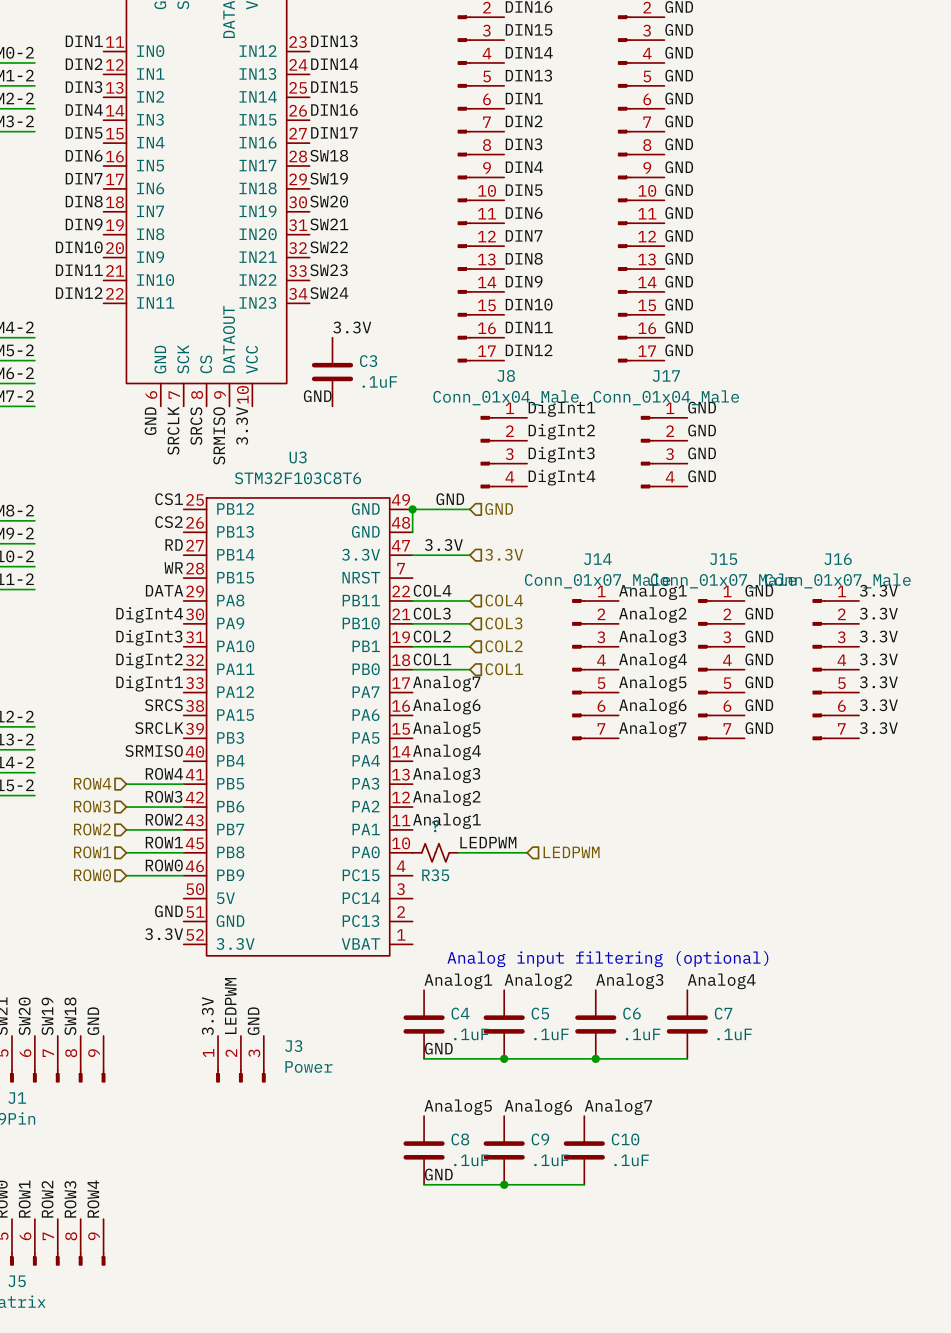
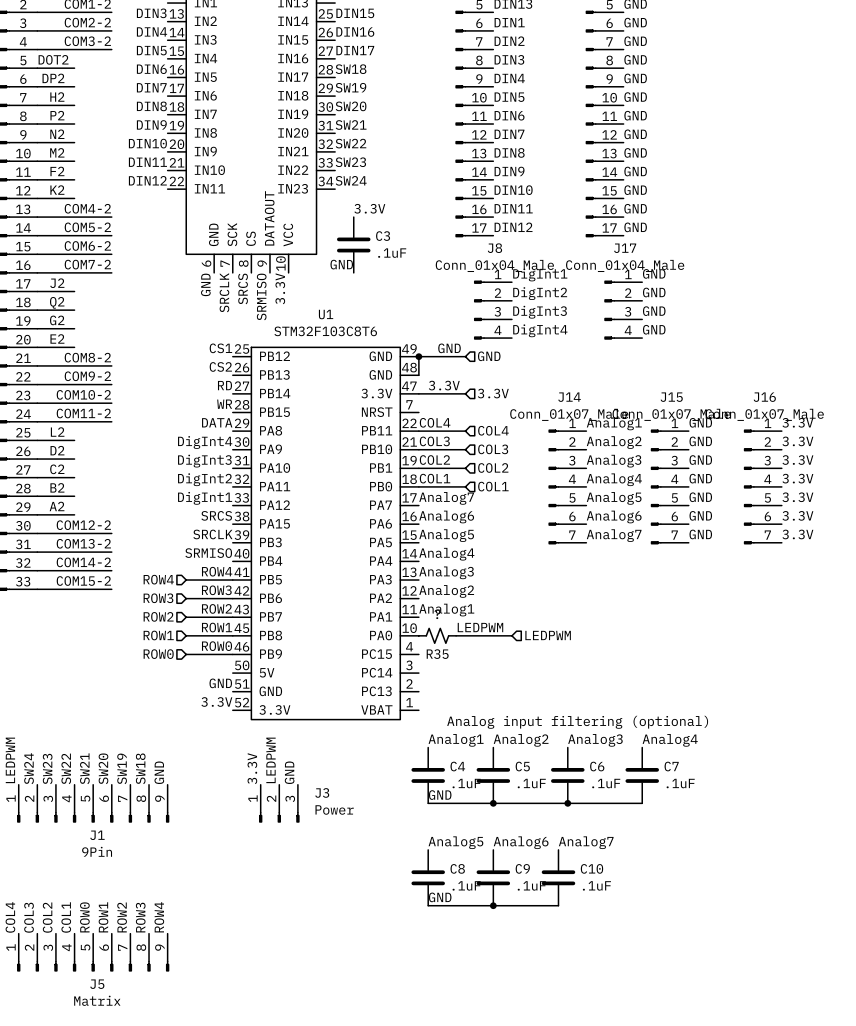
U3 name: U3 (298, 457) -> U1 (326, 314)

